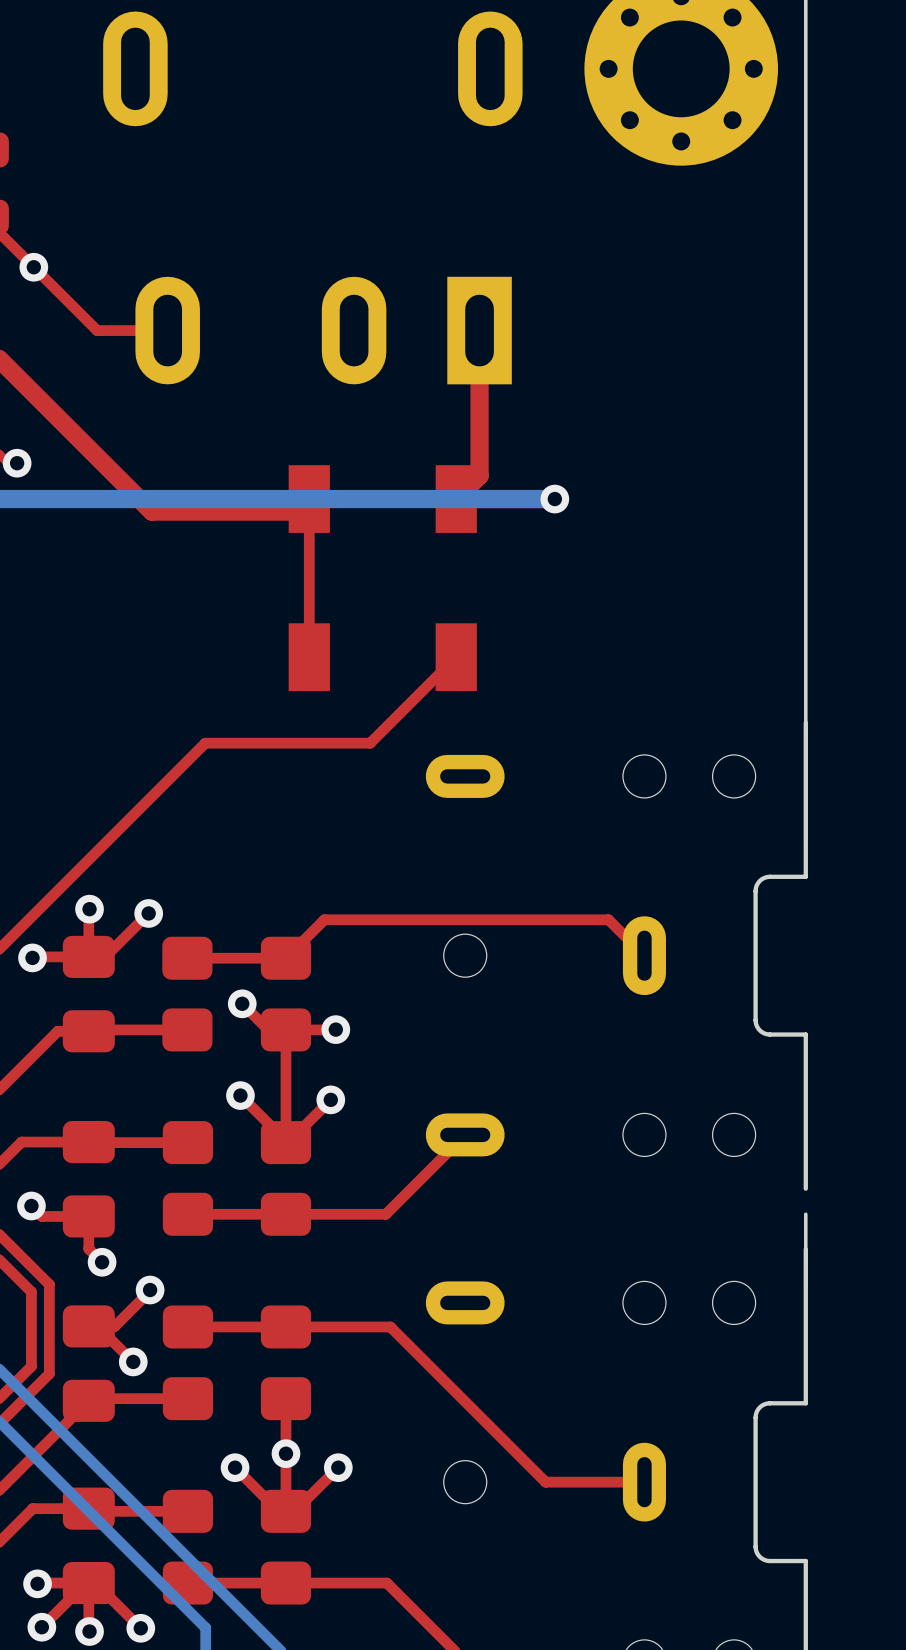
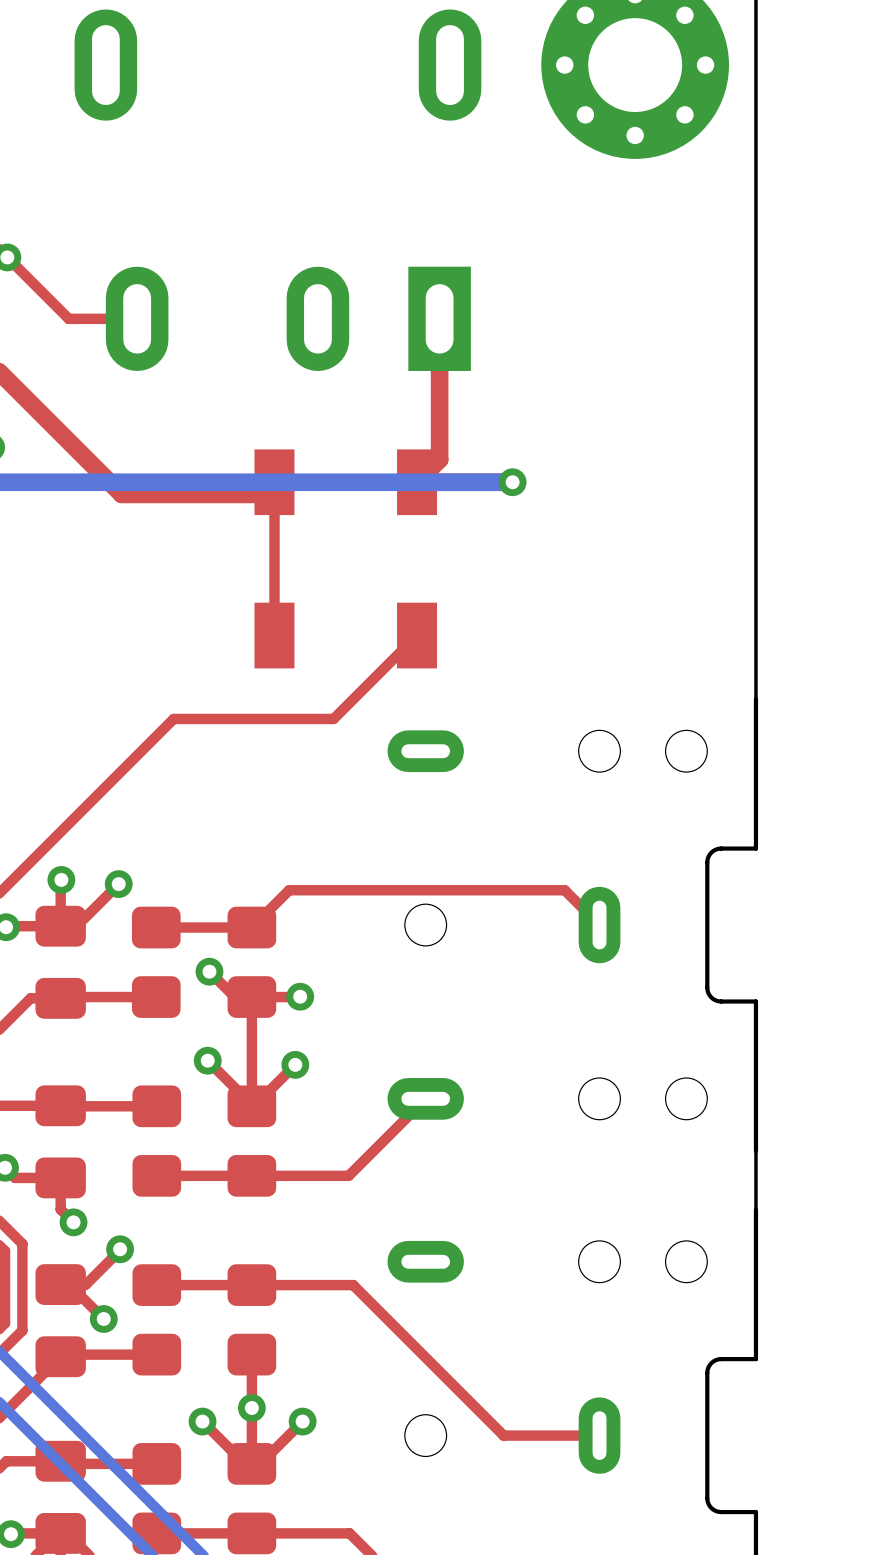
board edge: none -> (755, 1151) (755, 1175)

